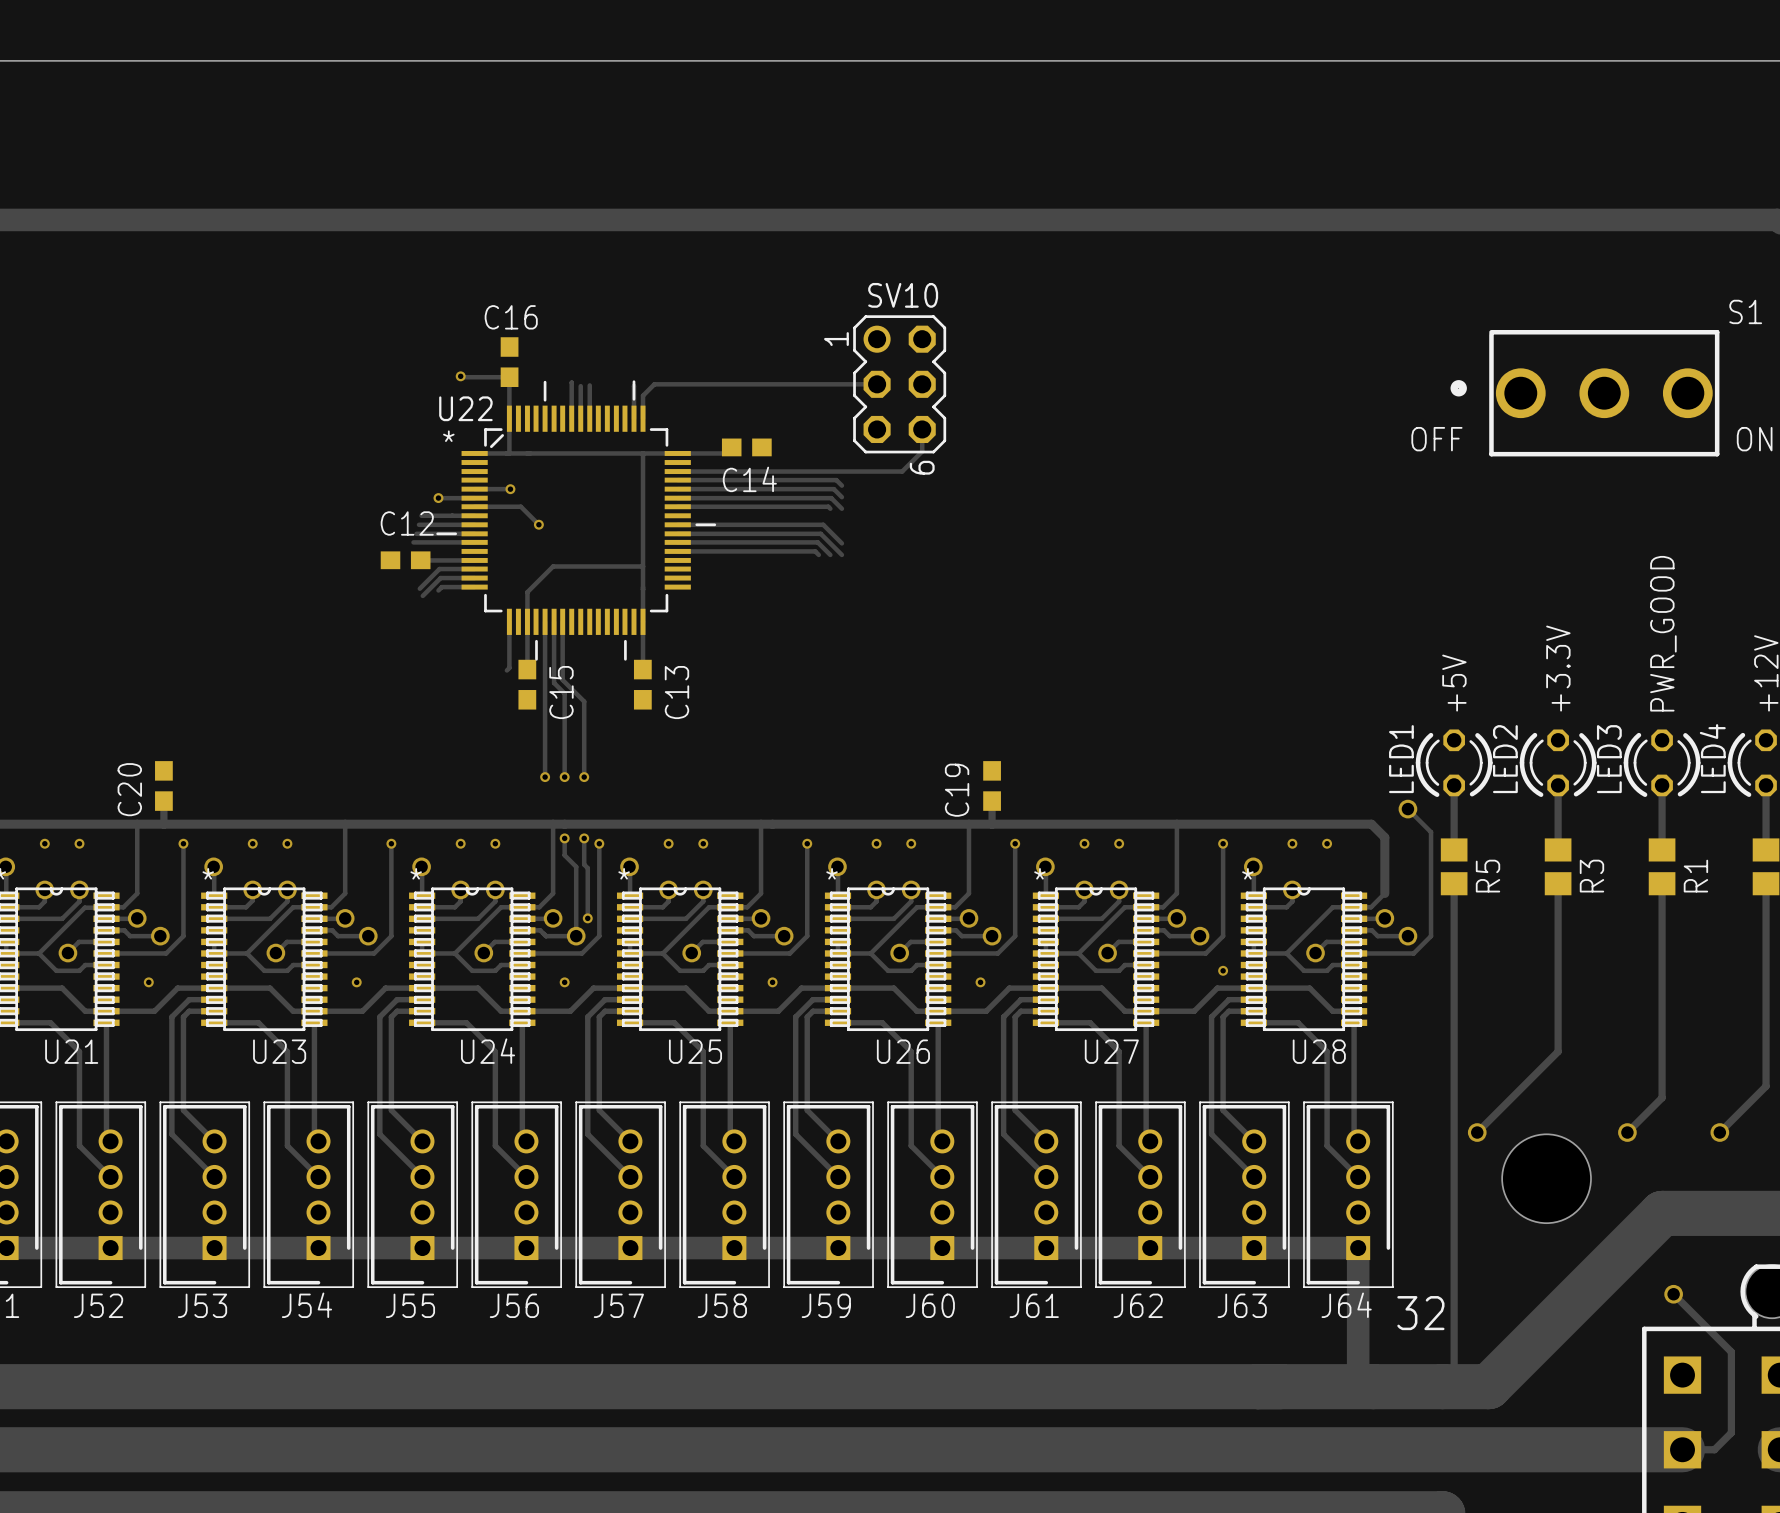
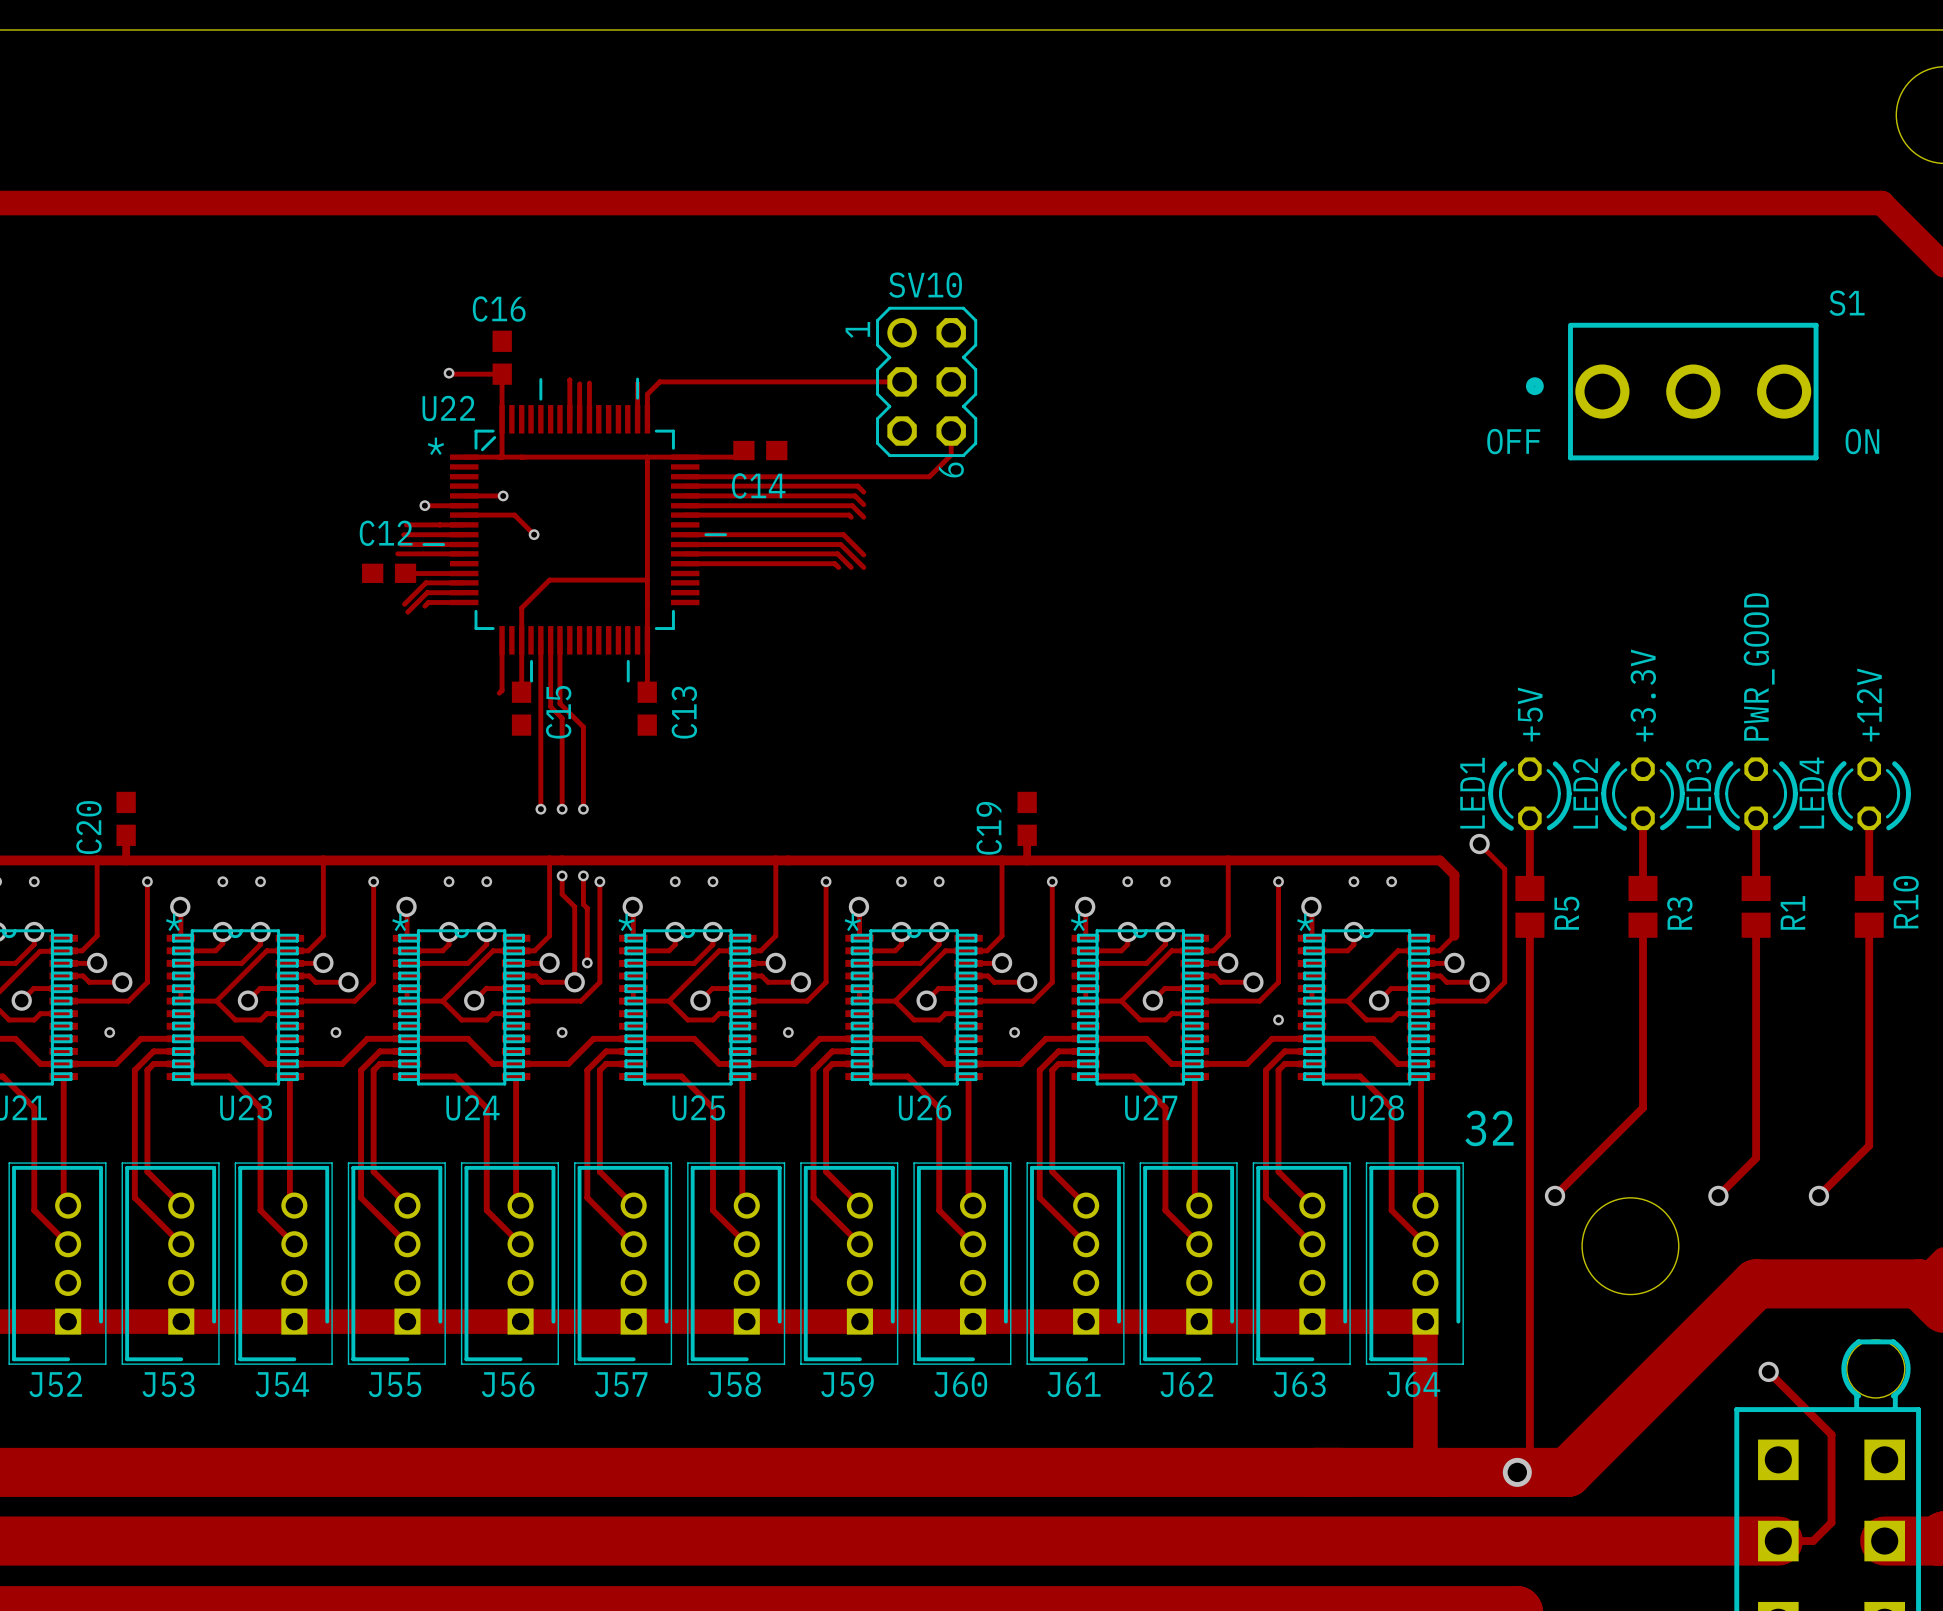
text position: 32 (1420, 1313) -> 32 (1489, 1128)
via: none -> (1517, 1472)

